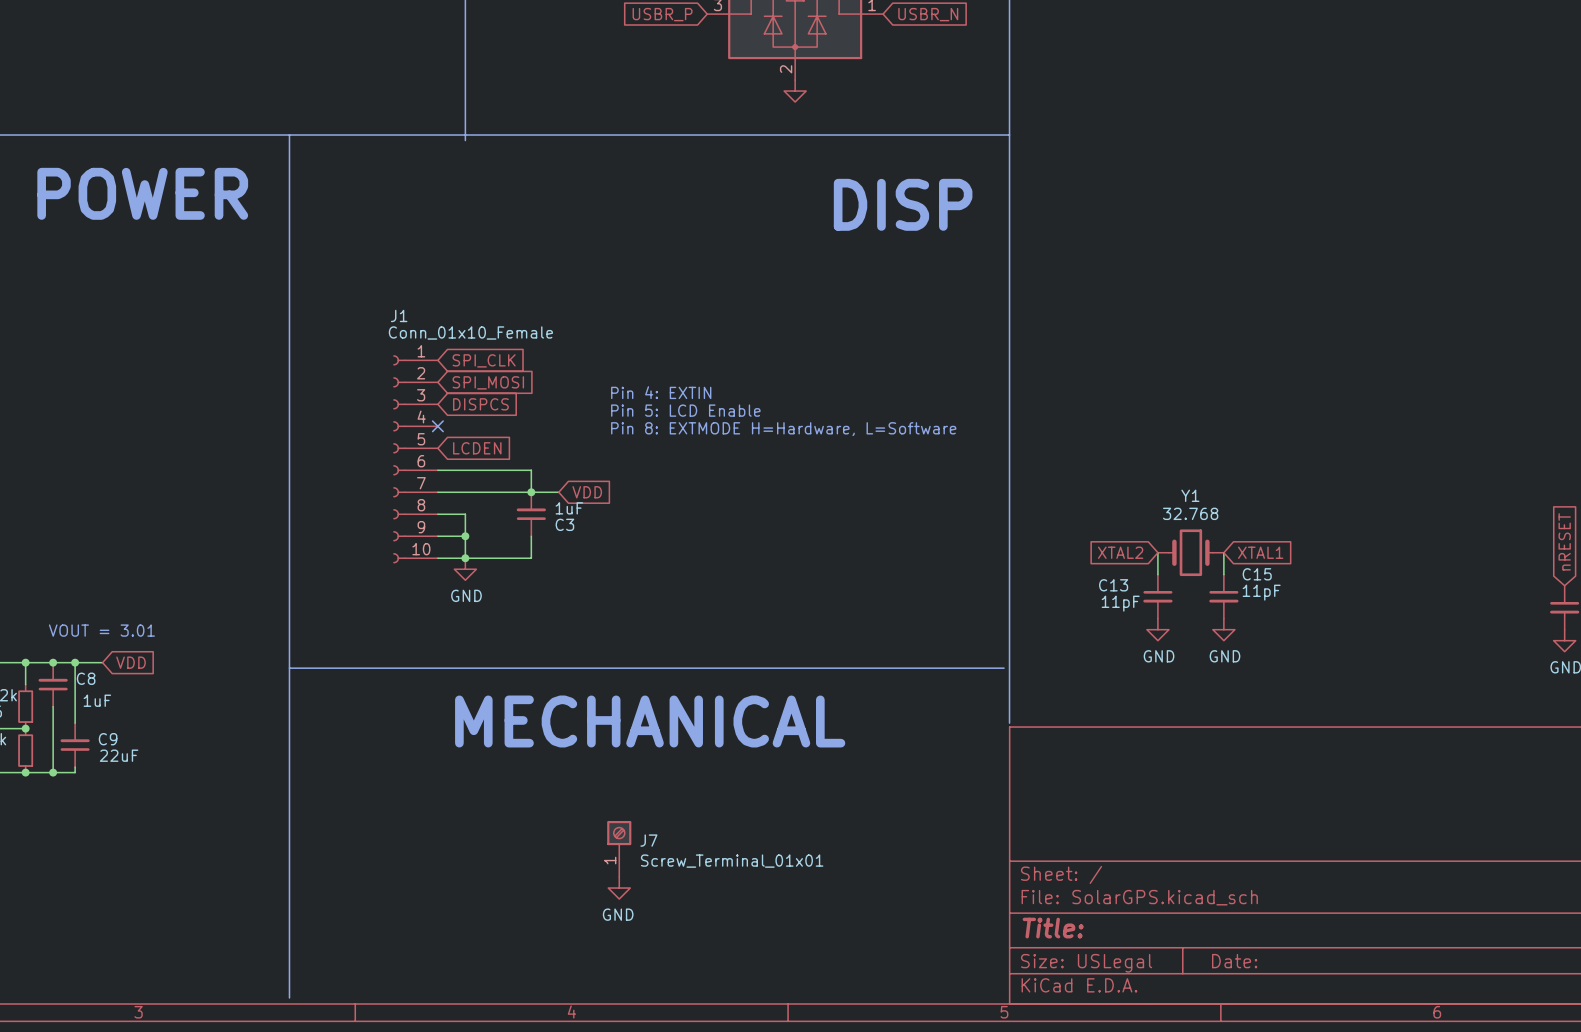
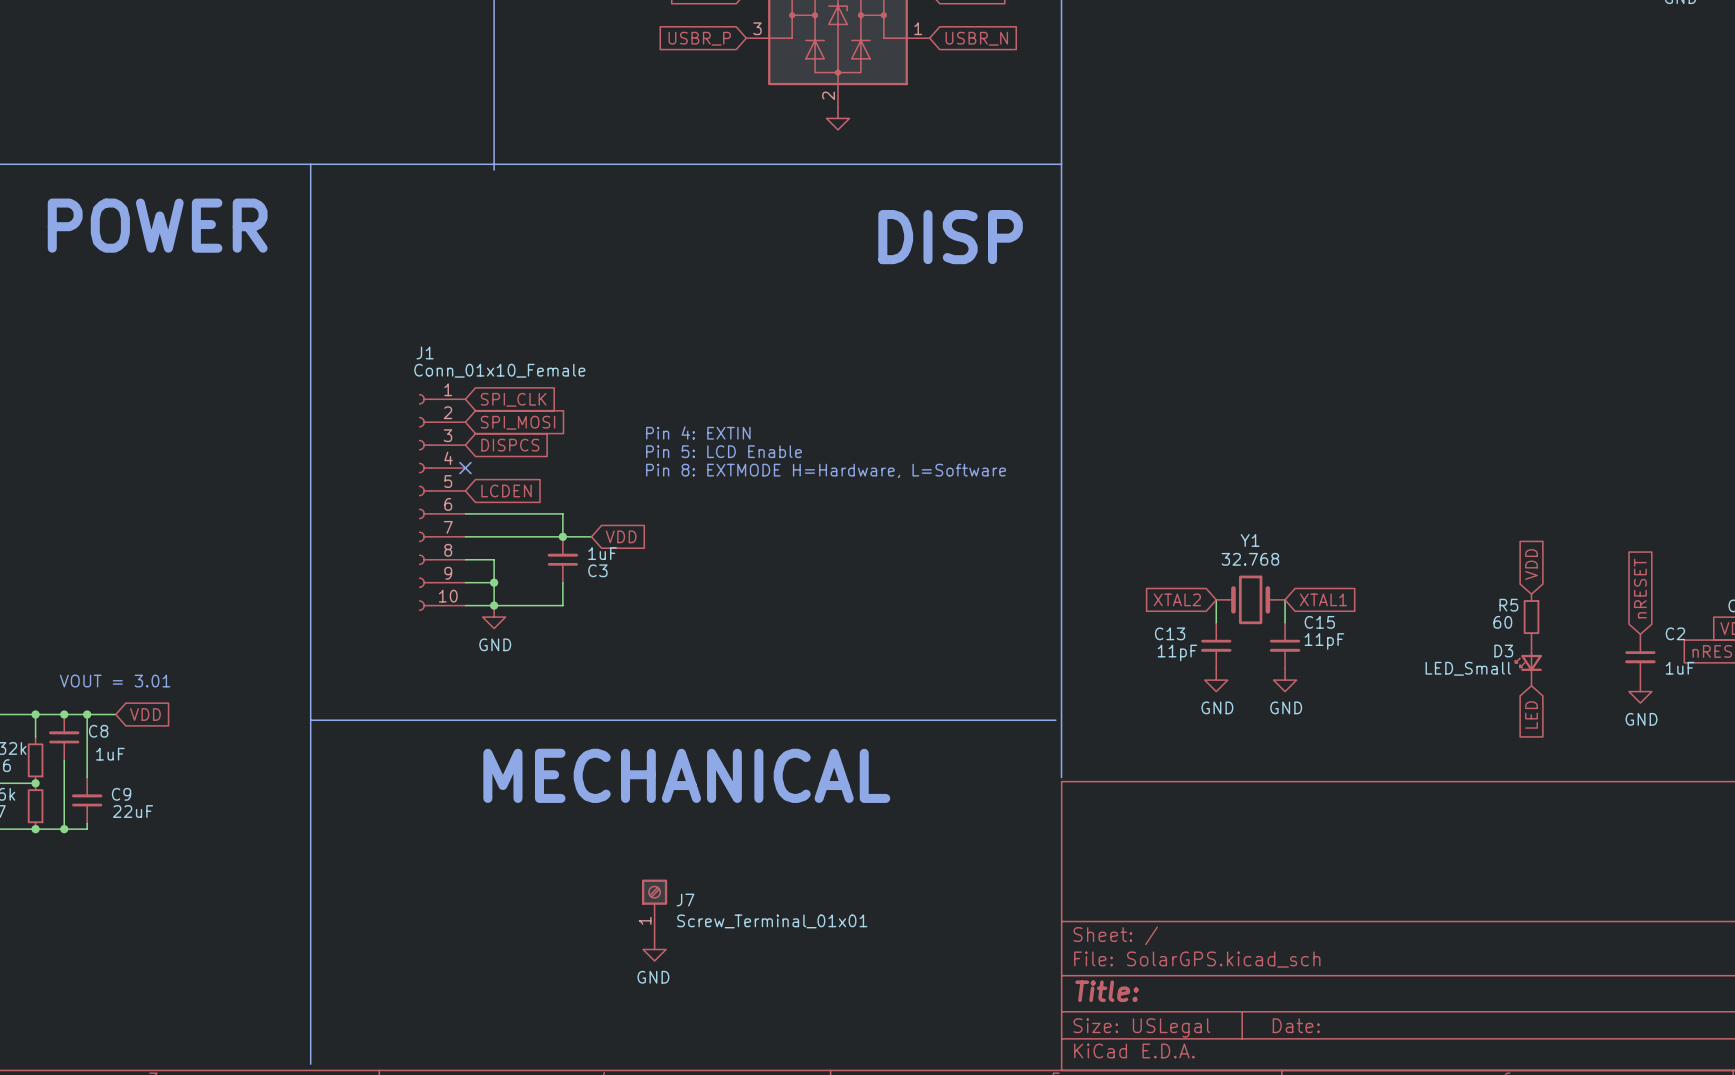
global label: none -> VDD (1531, 564)
R5: none -> 60 (1531, 617)
D3: none -> LED_Small (1528, 662)
global label: none -> LED (1531, 714)

